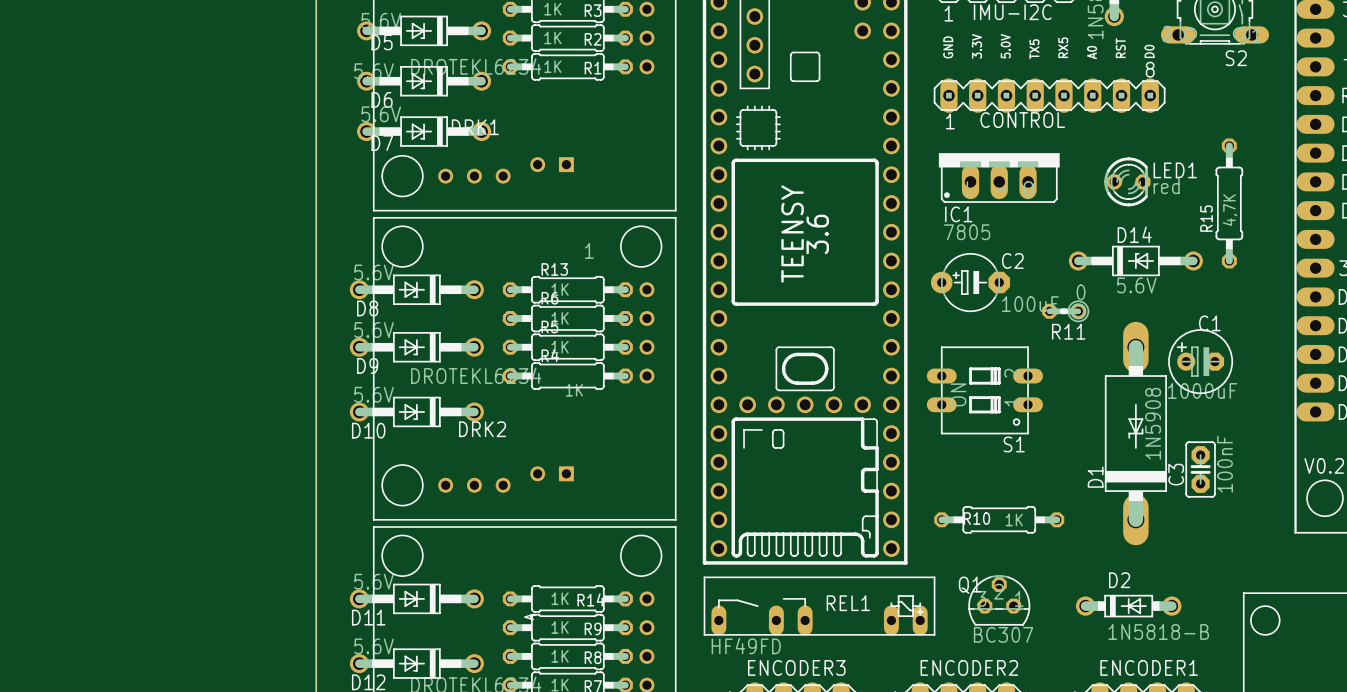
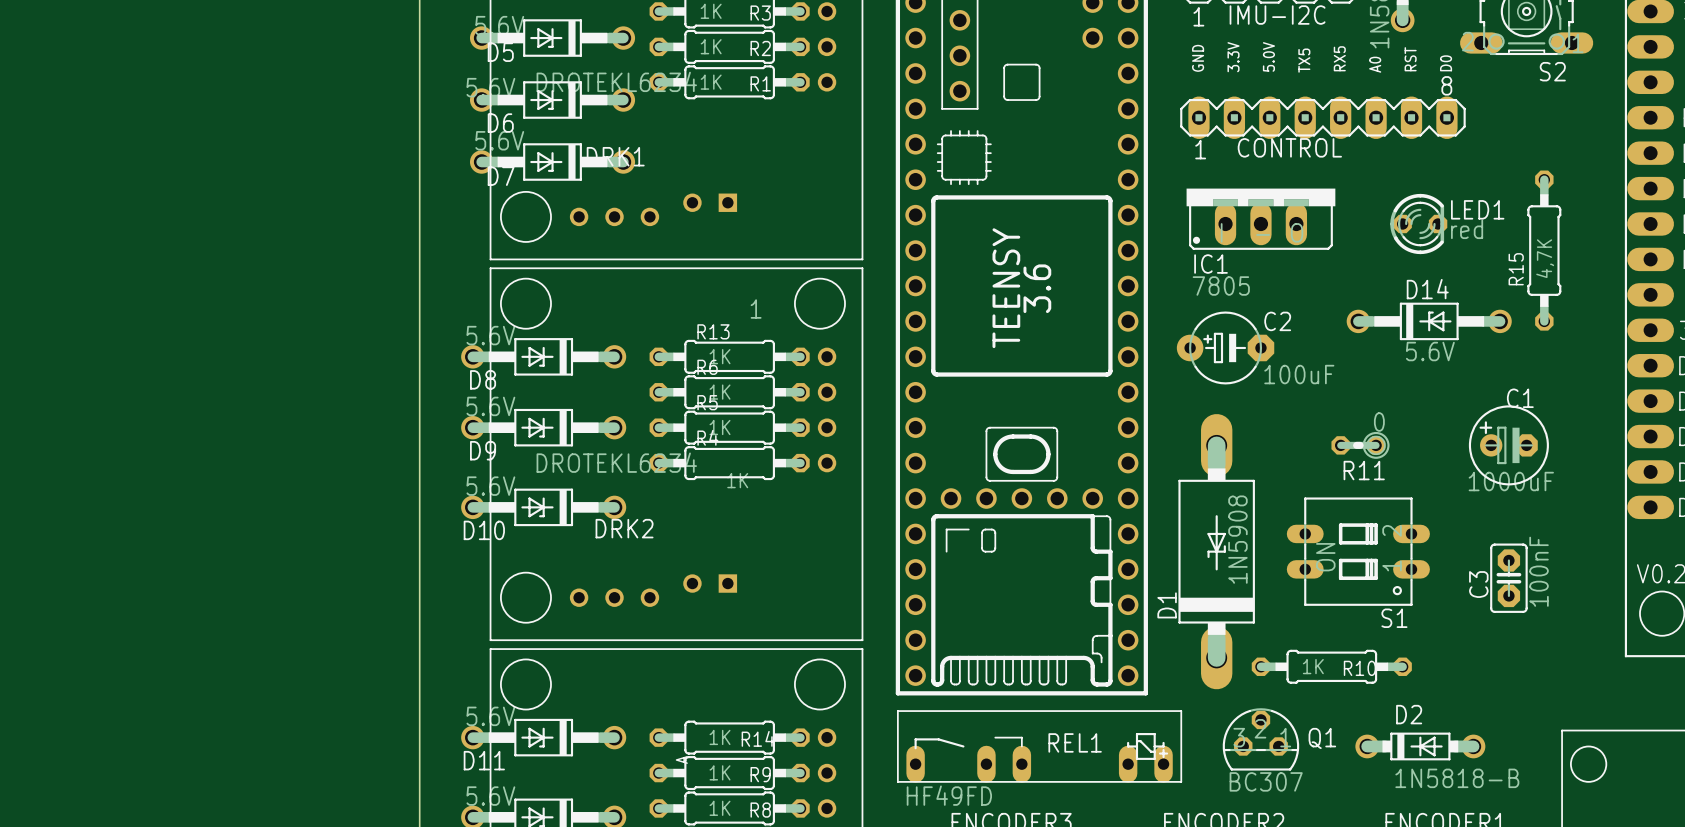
R11 position: (1065, 311) -> (1360, 445)
S1 position: (984, 390) -> (1358, 551)
D1 position: (1135, 433) -> (1216, 551)
R10 name position: R10 (976, 518) -> R10 (1359, 668)
R10 position: (999, 519) -> (1331, 666)
R10 value position: 1K (1014, 519) -> 1K (1313, 666)
Q1 name position: Q1 (970, 585) -> Q1 (1322, 738)

